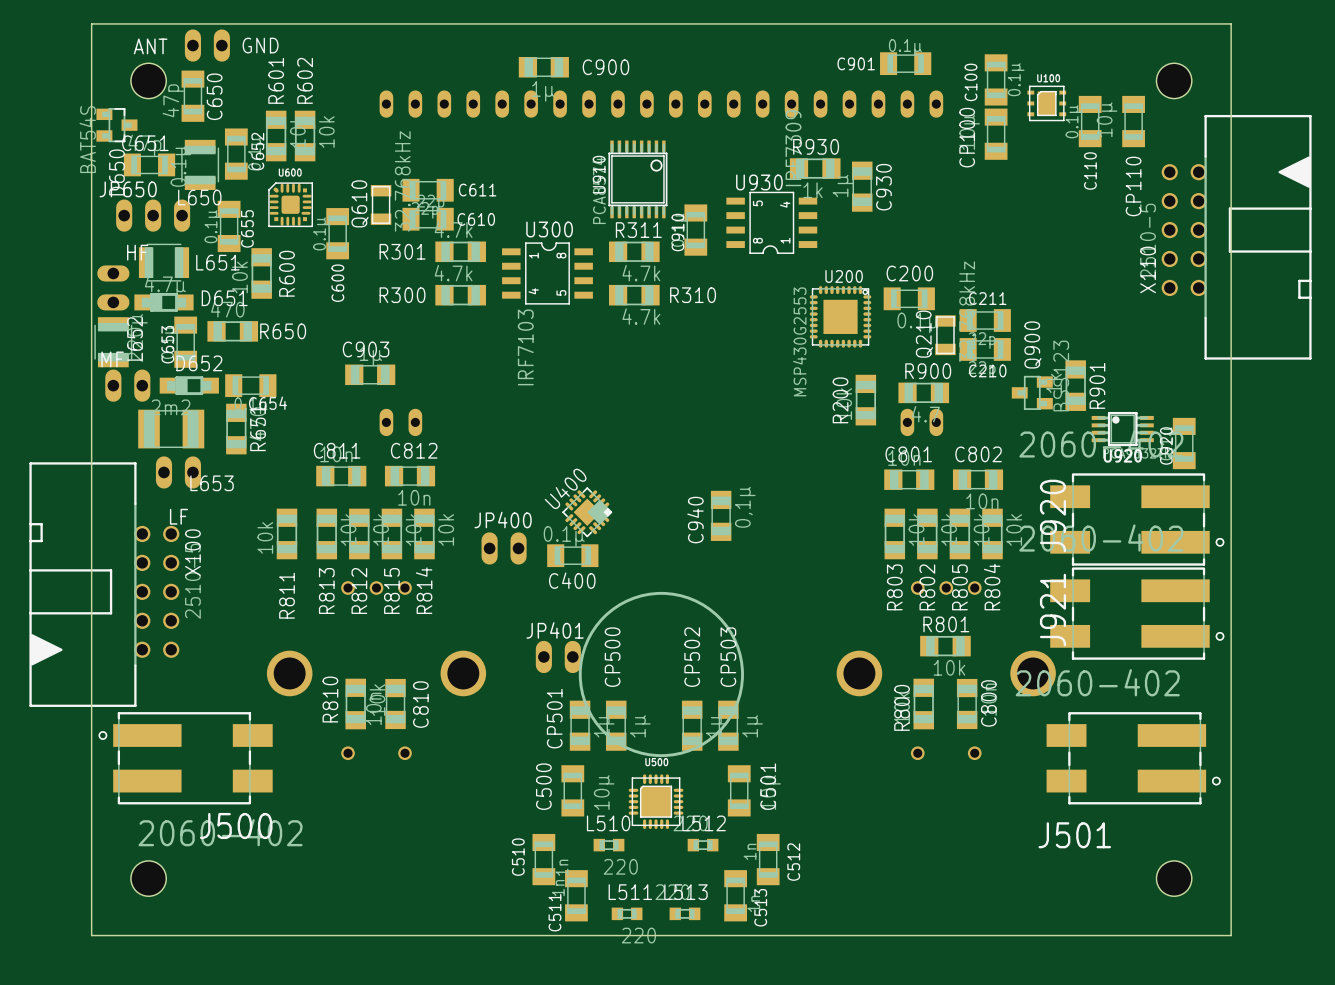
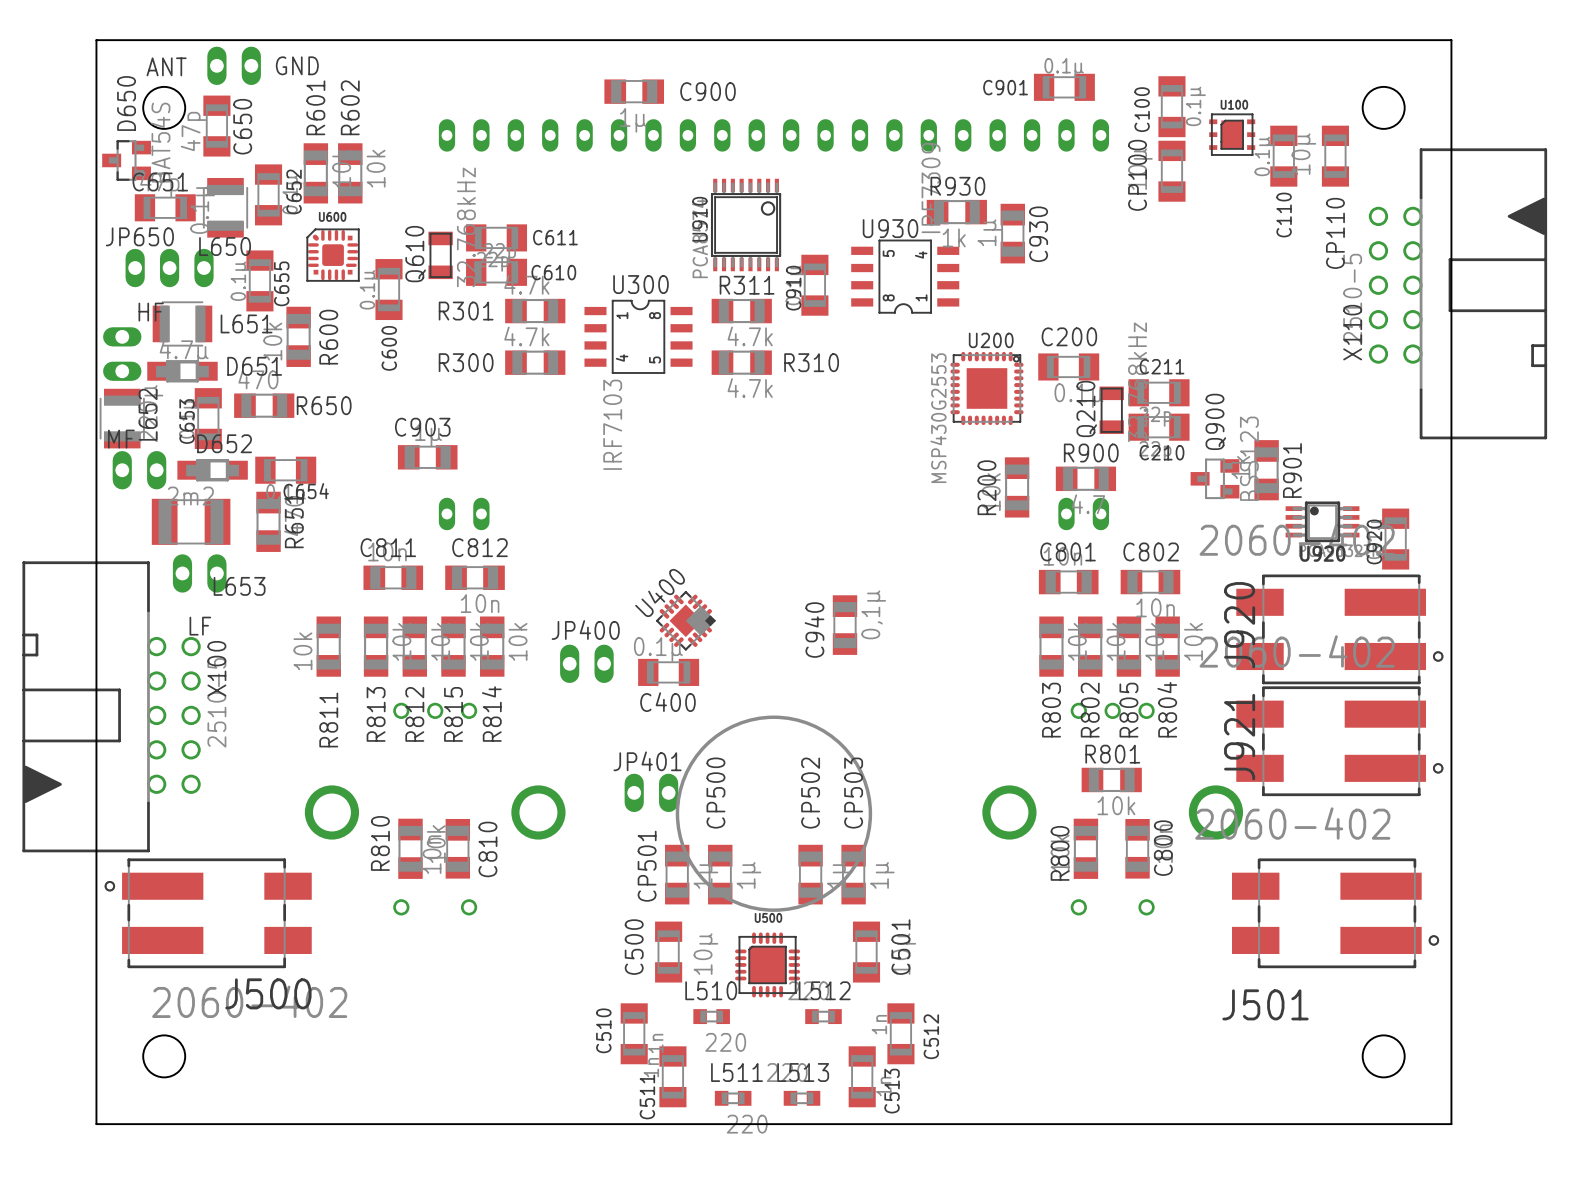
D650 rotation: 0° (116, 125) -> 180° (126, 160)

